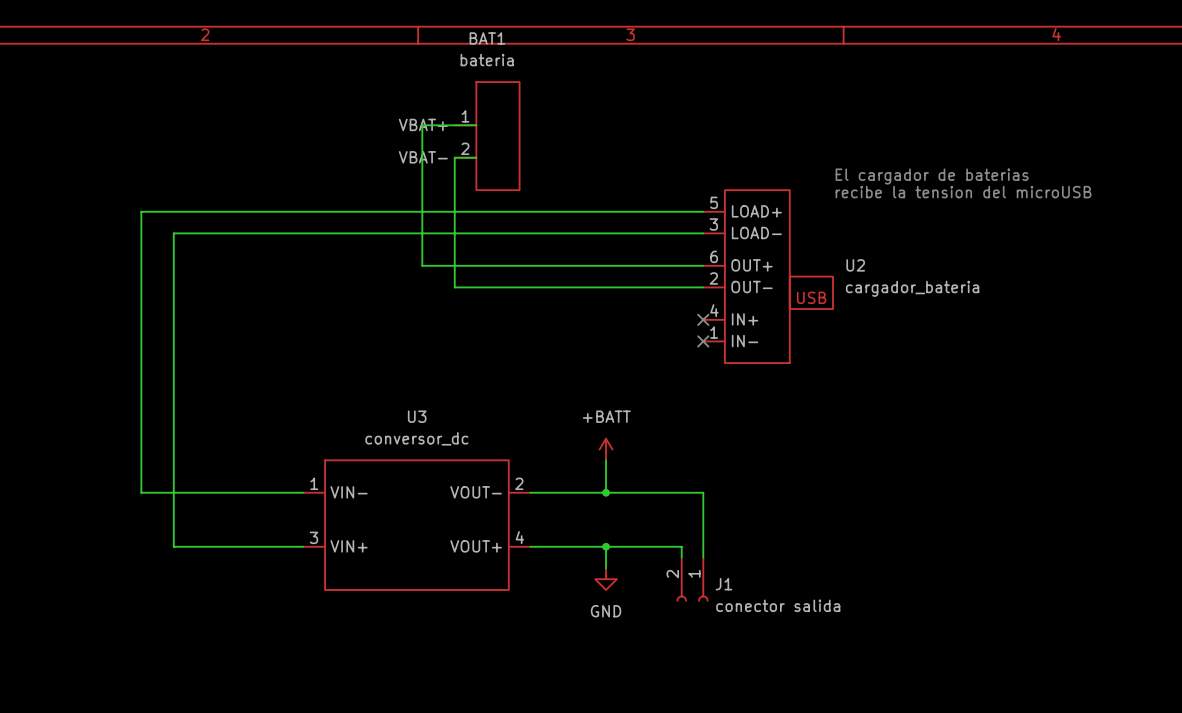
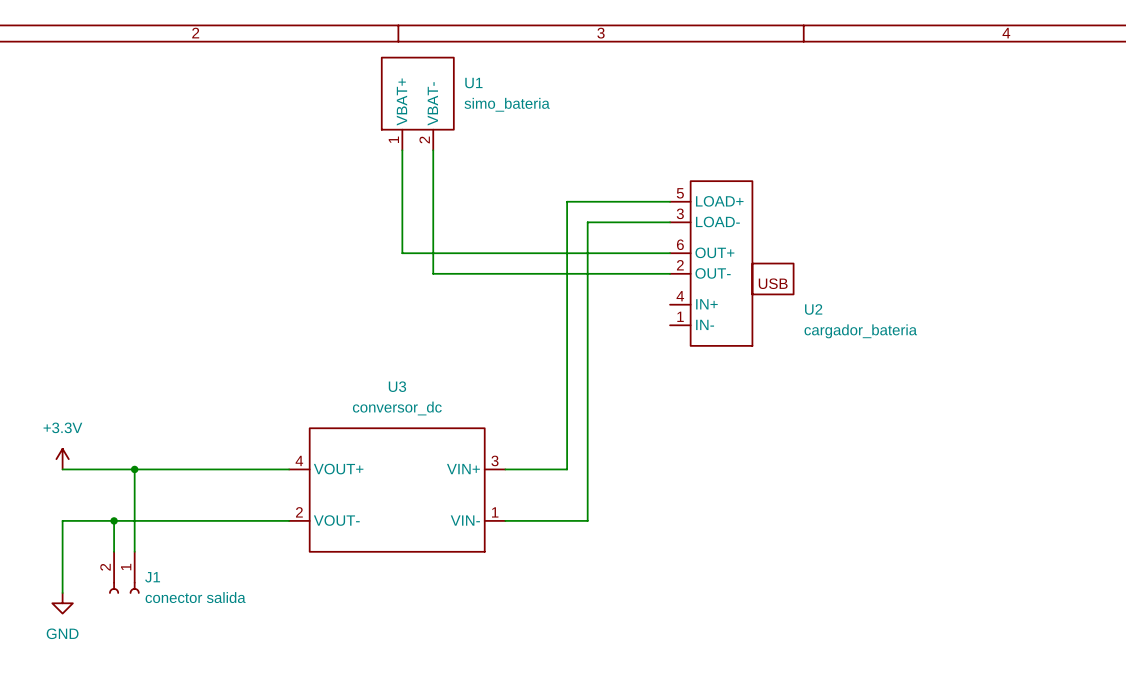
U1: none -> simo_bateria (417, 103)
wire: (476, 125) (422, 125) (422, 157) -> none
BAT1: bateria (487, 136) -> none
wire: (454, 157) (476, 157) -> none
text: El cargador de baterias (932, 176) -> none
text: recibe la tension del microUSB (963, 192) -> none
wire: (595, 211) (141, 211) (141, 492) -> none
wire: (616, 233) (173, 233) (173, 546) -> (62, 592) (62, 520) (165, 520)
U2 name position: U2 (855, 265) -> U2 (813, 309)
U2 value position: cargador_bateria (912, 288) -> cargador_bateria (860, 331)
no-connect mark: (703, 319) -> none
no-connect mark: (703, 341) -> none
power symbol: +BATT (606, 449) -> none
wire: (606, 460) (606, 492) -> none
power symbol: none -> +3.3V (62, 459)
wire: none -> (62, 469) (134, 469) (134, 551)
junction: none -> (134, 469)
wire: (595, 492) (703, 492) (703, 557) -> (567, 469) (567, 201)
junction: (606, 492) -> none
U3 rotation: 0° (416, 525) -> 180° (397, 490)
wire: none -> (114, 520) (114, 551)
junction: none -> (114, 520)
wire: (606, 546) (606, 568) -> none
junction: (606, 546) -> none
wire: (616, 546) (681, 546) (681, 557) -> (587, 520) (587, 222)
power symbol: GND (606, 579) -> none
J1 position: (692, 579) -> (124, 572)
power symbol: none -> GND (62, 603)

